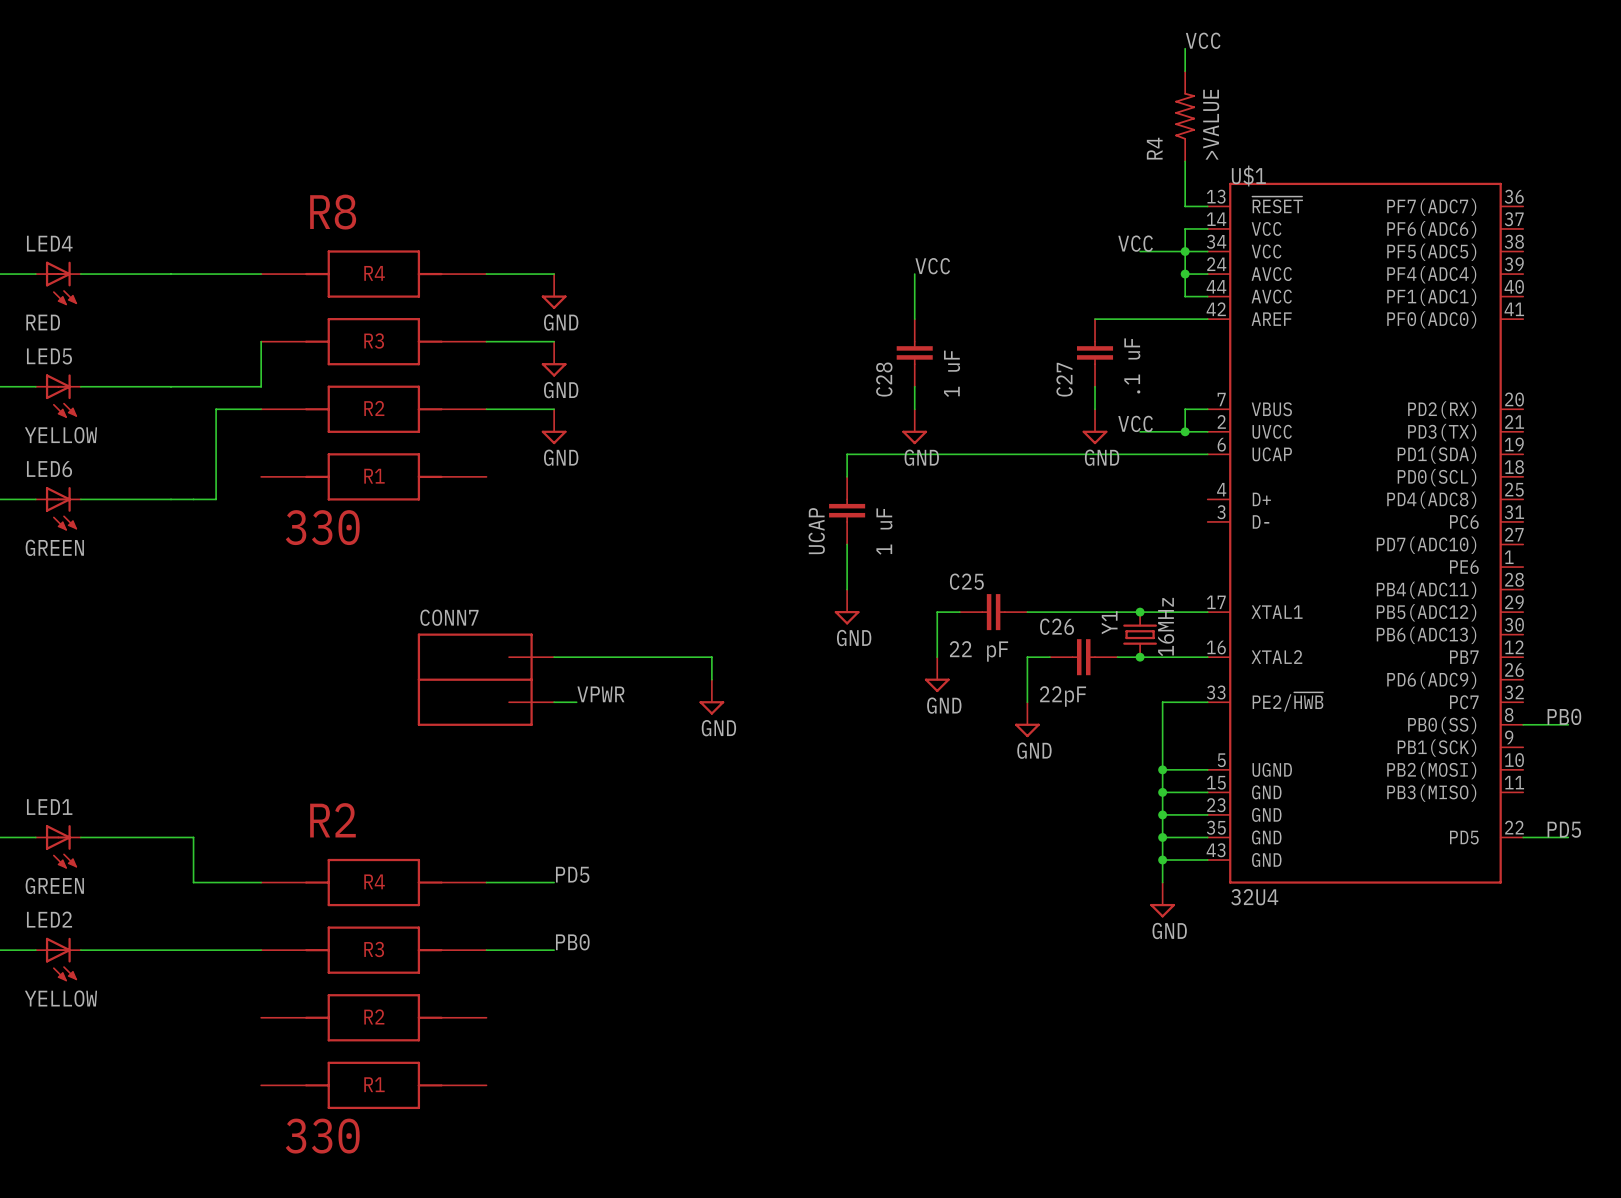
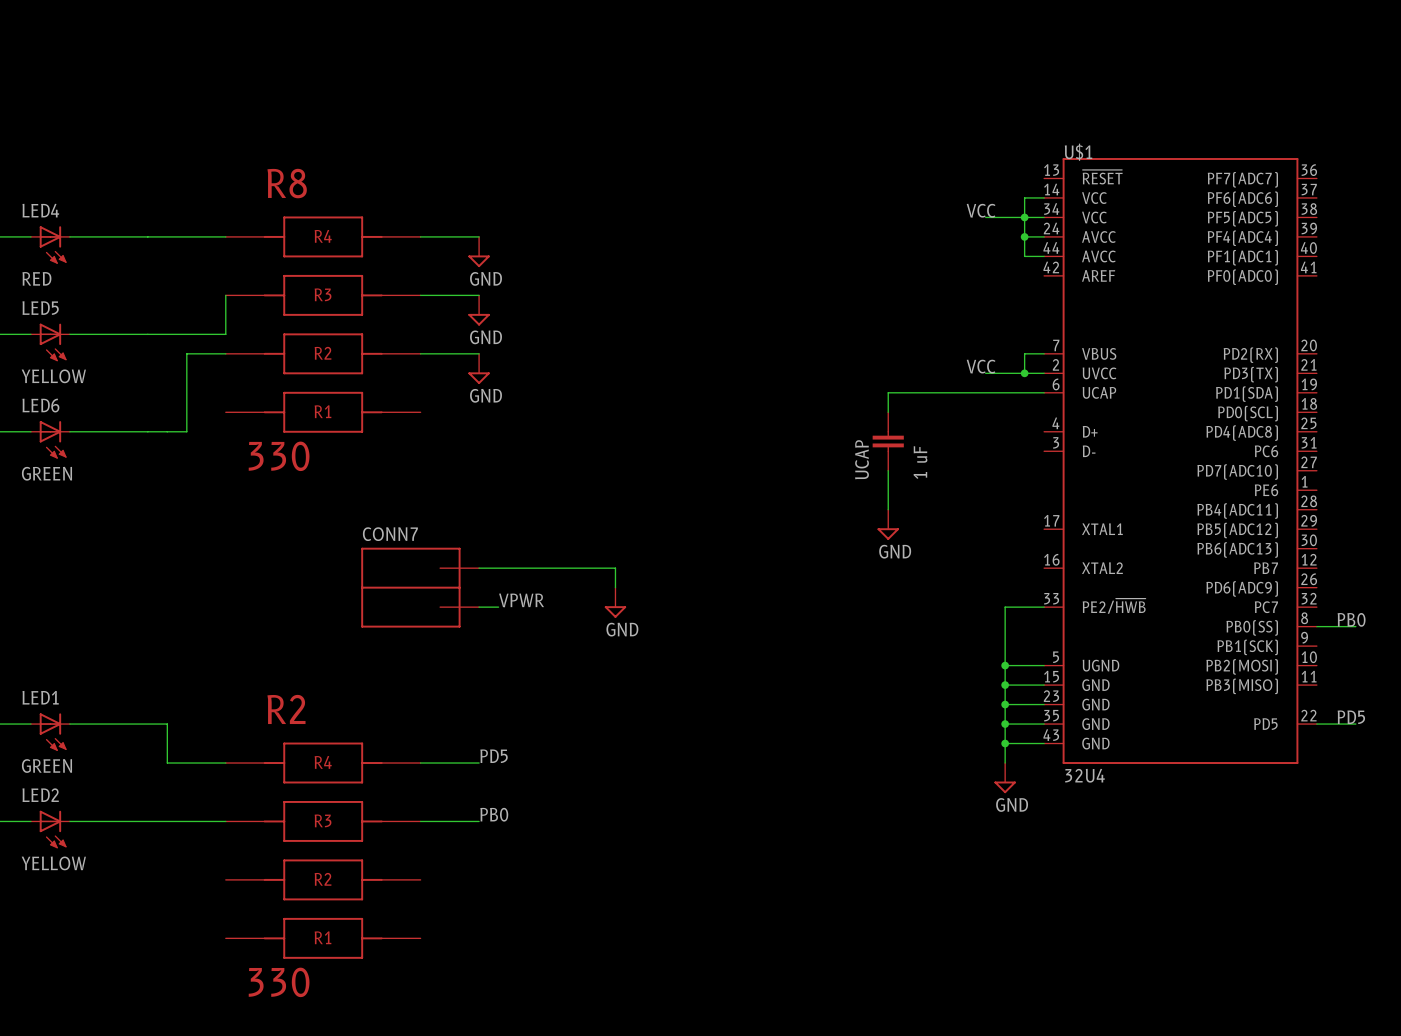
label: VCC (1203, 40) -> none
wire: (1185, 48) (1185, 71) -> none
R4: >VALUE (1185, 116) -> none
wire: (1185, 161) (1185, 206) (1207, 206) -> none
label: VCC (932, 266) -> none
wire: (914, 274) (914, 319) -> none
wire: (1095, 319) (1207, 319) -> none
C28: 1 uF (914, 352) -> none
C27: .1 uF (1095, 352) -> none
wire: (914, 386) (914, 409) -> none
wire: (1095, 386) (1095, 409) -> none
power symbol: GND (914, 426) -> none
power symbol: GND (1095, 426) -> none
wire: (1027, 454) (847, 454) (847, 476) -> (888, 392) (888, 412)
UCAP position: (847, 510) -> (888, 441)
wire: (847, 544) (847, 589) -> (888, 470) (888, 509)
power symbol: GND (847, 607) -> none
power symbol: none -> GND (888, 524)
wire: (959, 612) (937, 612) (937, 657) -> none
C25: 22 pF (993, 612) -> none
wire: (1027, 612) (1207, 612) -> none
junction: (1140, 612) -> none
Y1: 16MHz (1140, 634) -> none
wire: (1049, 657) (1027, 657) (1027, 702) -> none
C26: 22pF (1083, 657) -> none
wire: (1117, 657) (1207, 657) -> none
junction: (1140, 657) -> none
power symbol: GND (937, 674) -> none
power symbol: GND (1027, 719) -> none

